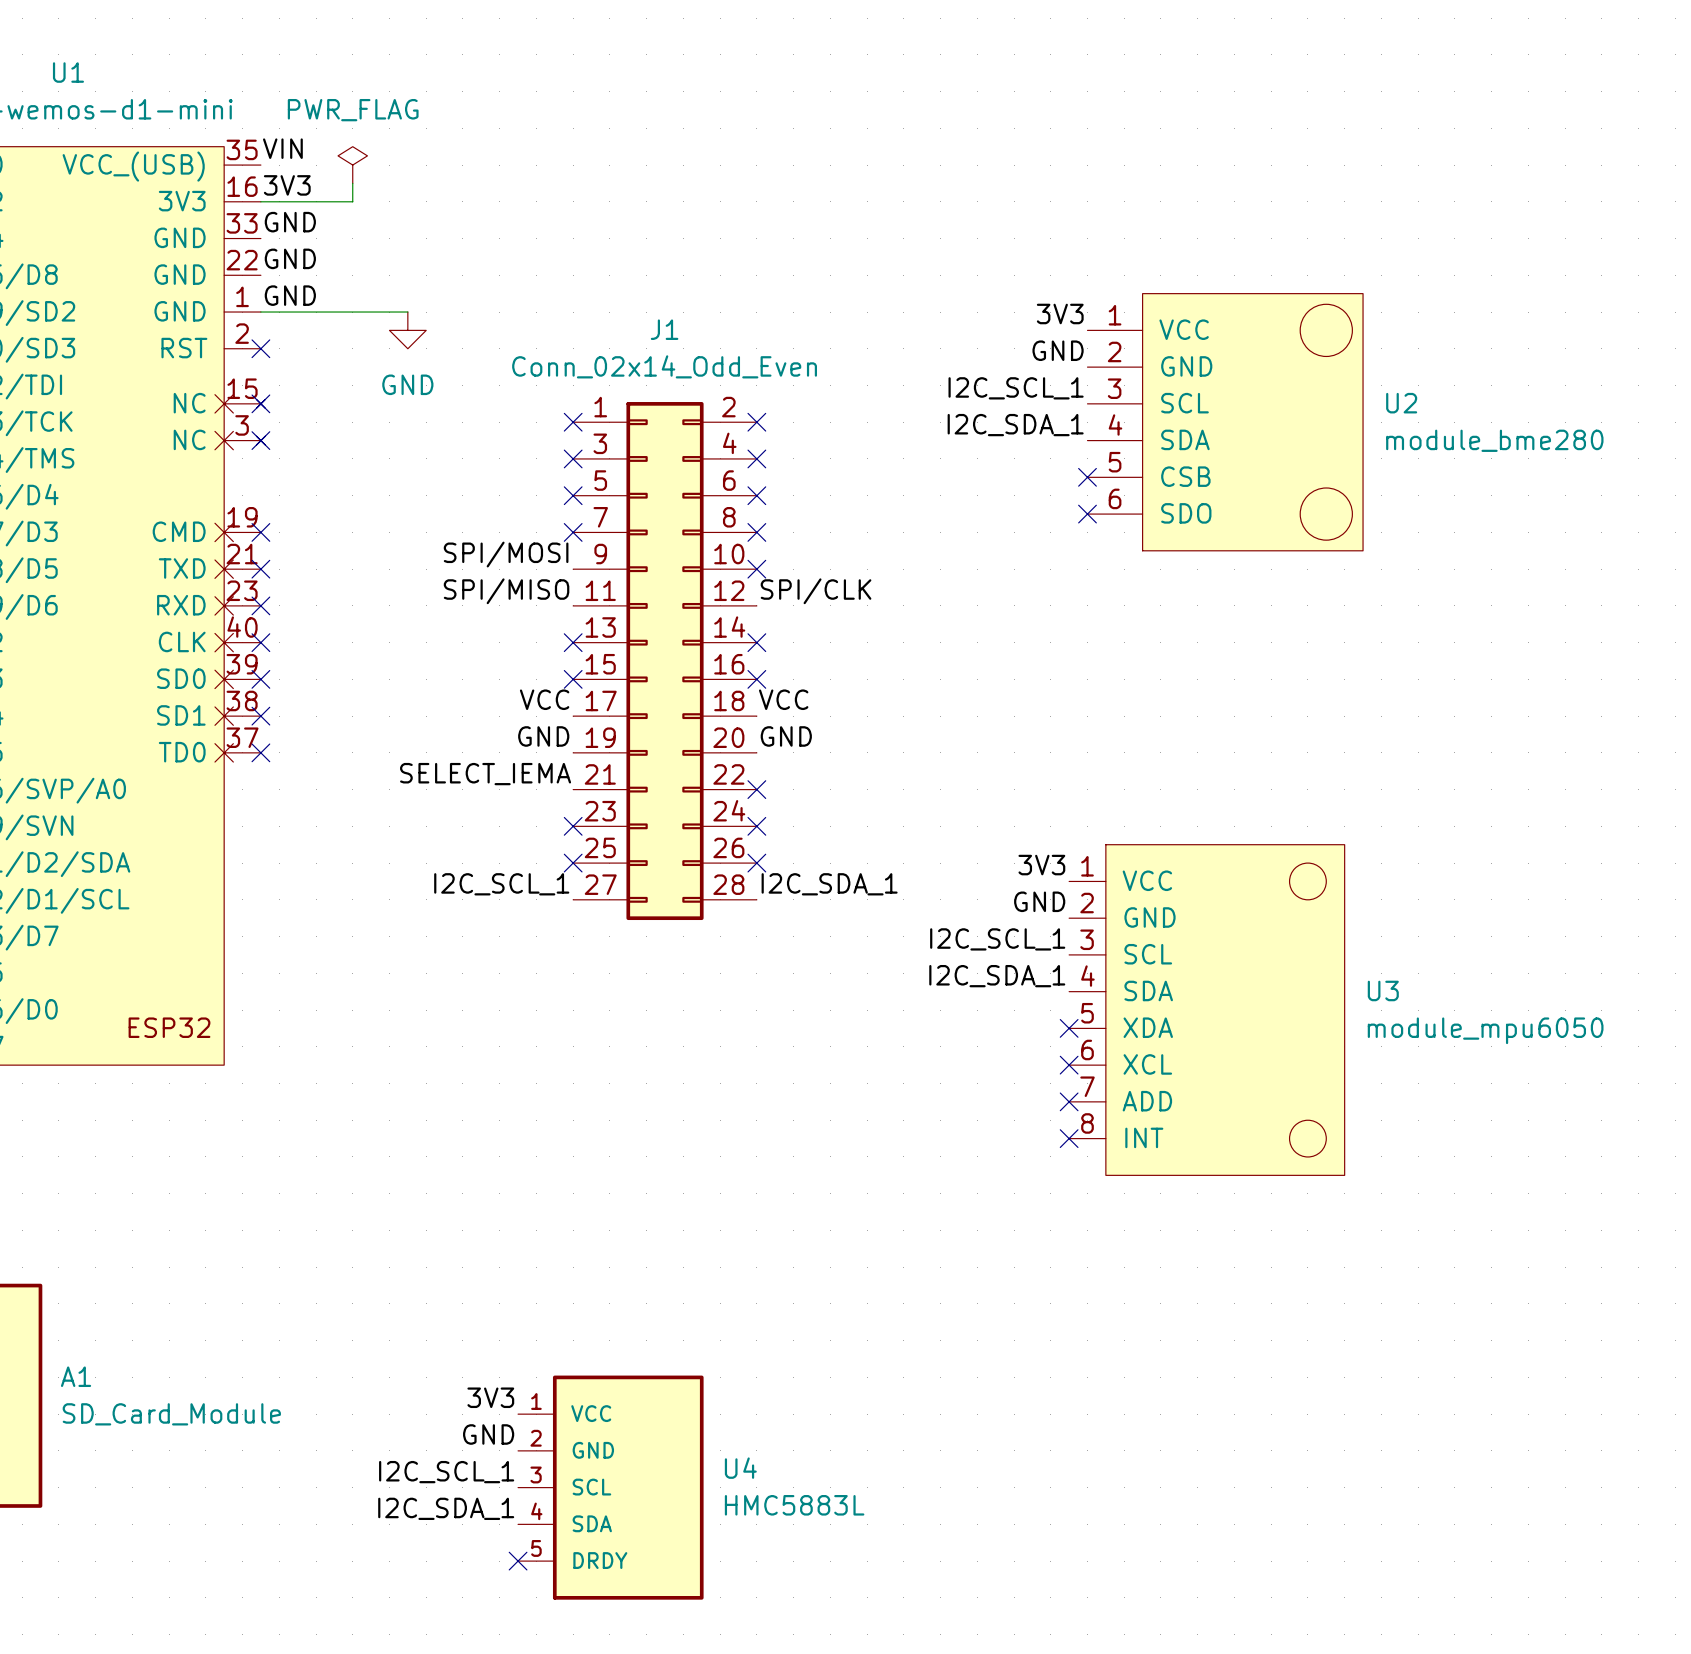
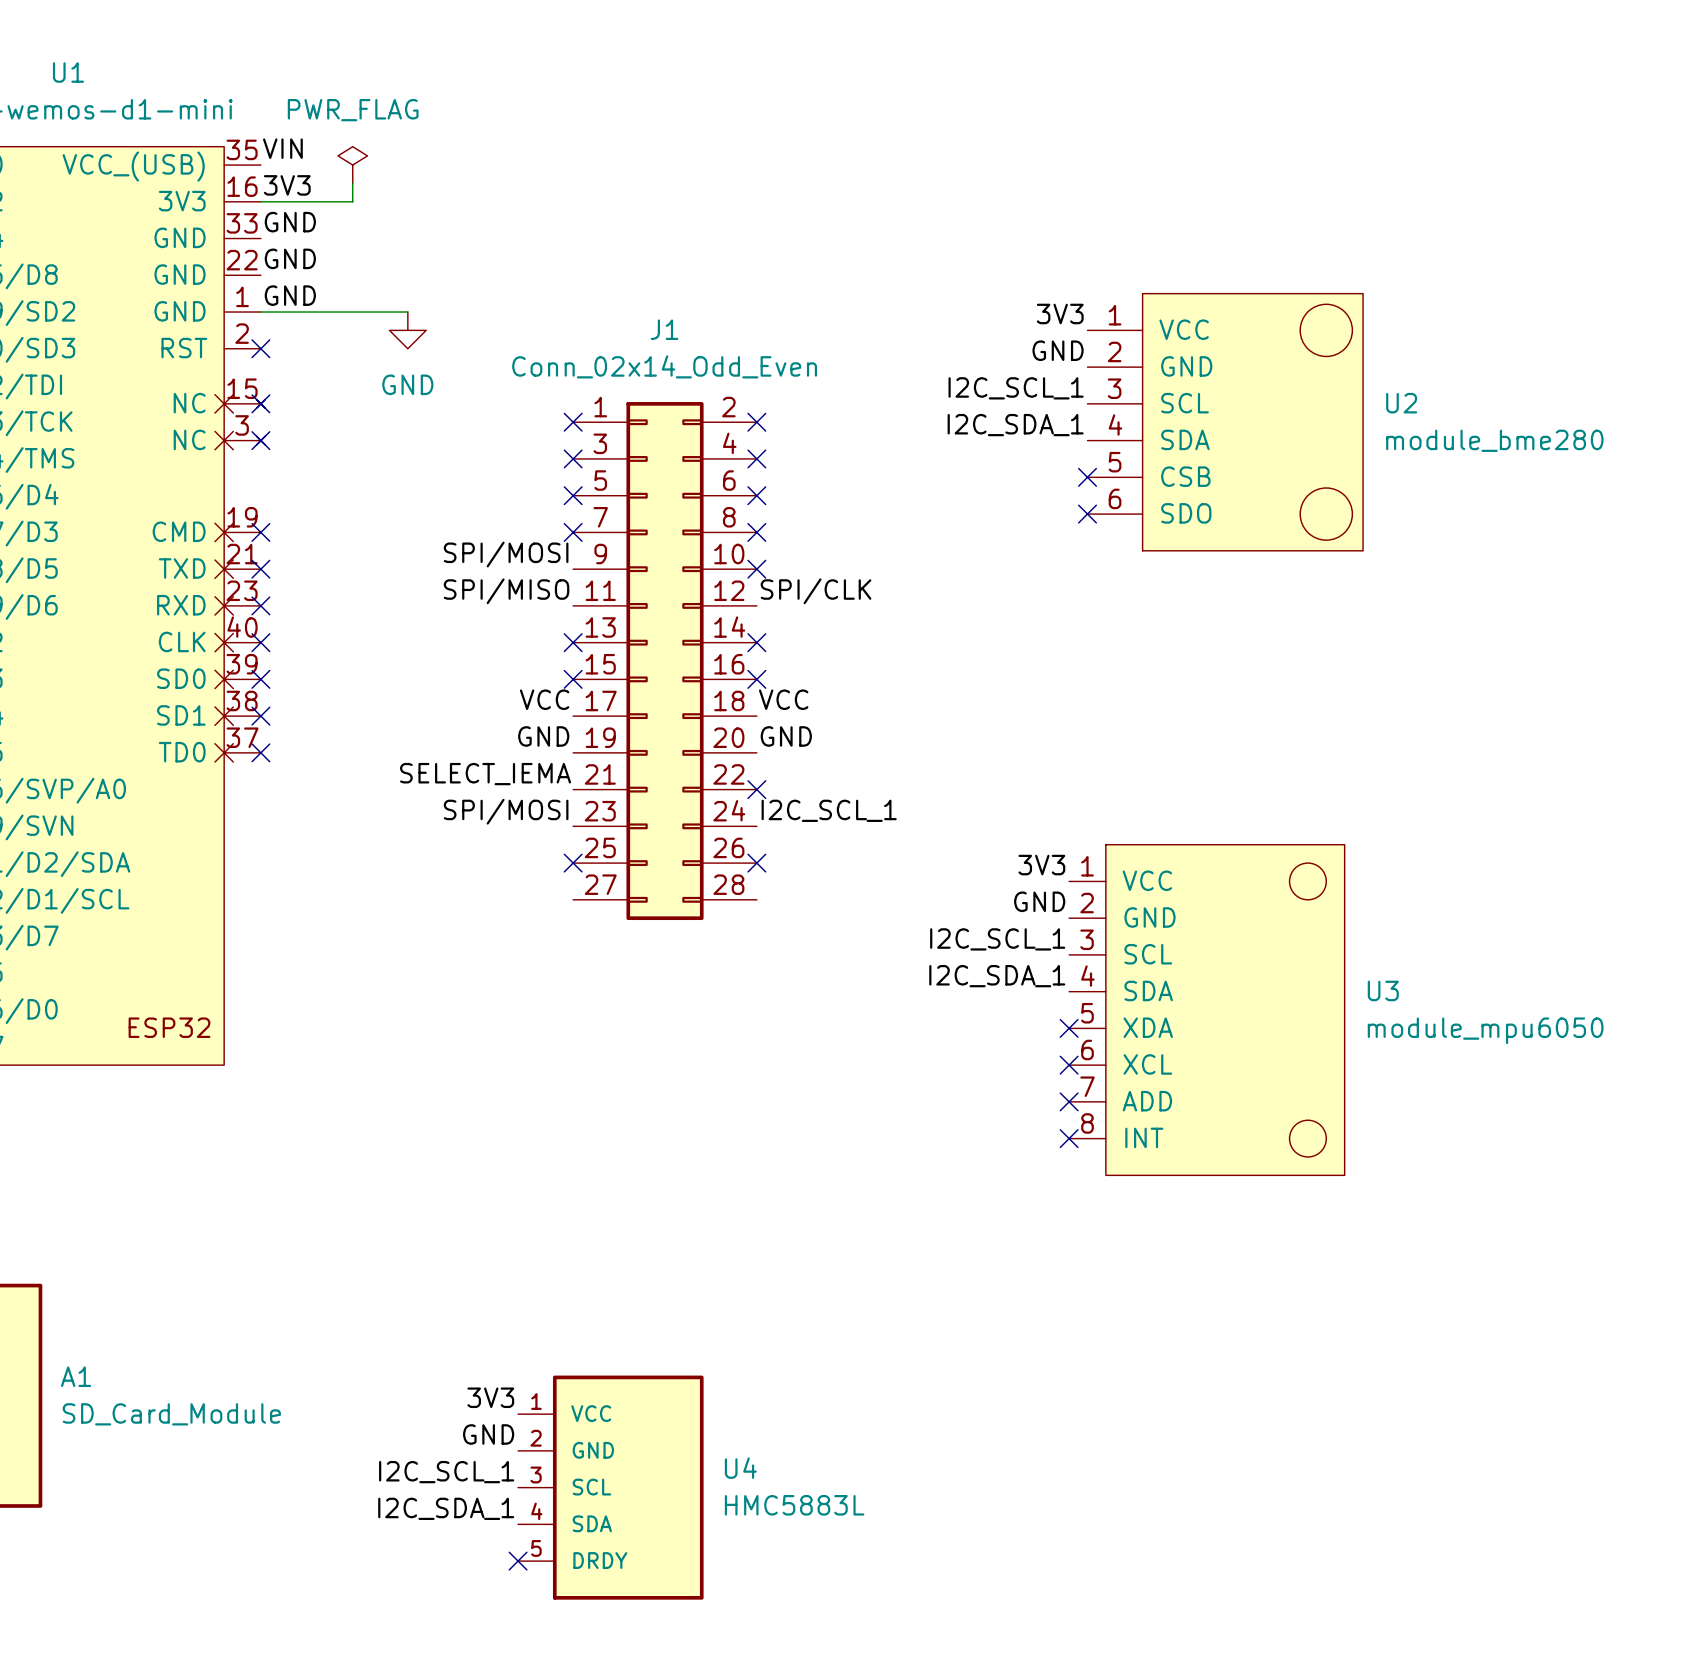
label: none -> SPI/MOSI (506, 811)
no-connect mark: (573, 826) -> none
no-connect mark: (756, 826) -> none
label position: I2C_SCL_1 (501, 884) -> I2C_SCL_1 (829, 810)
label: I2C_SDA_1 (829, 884) -> none

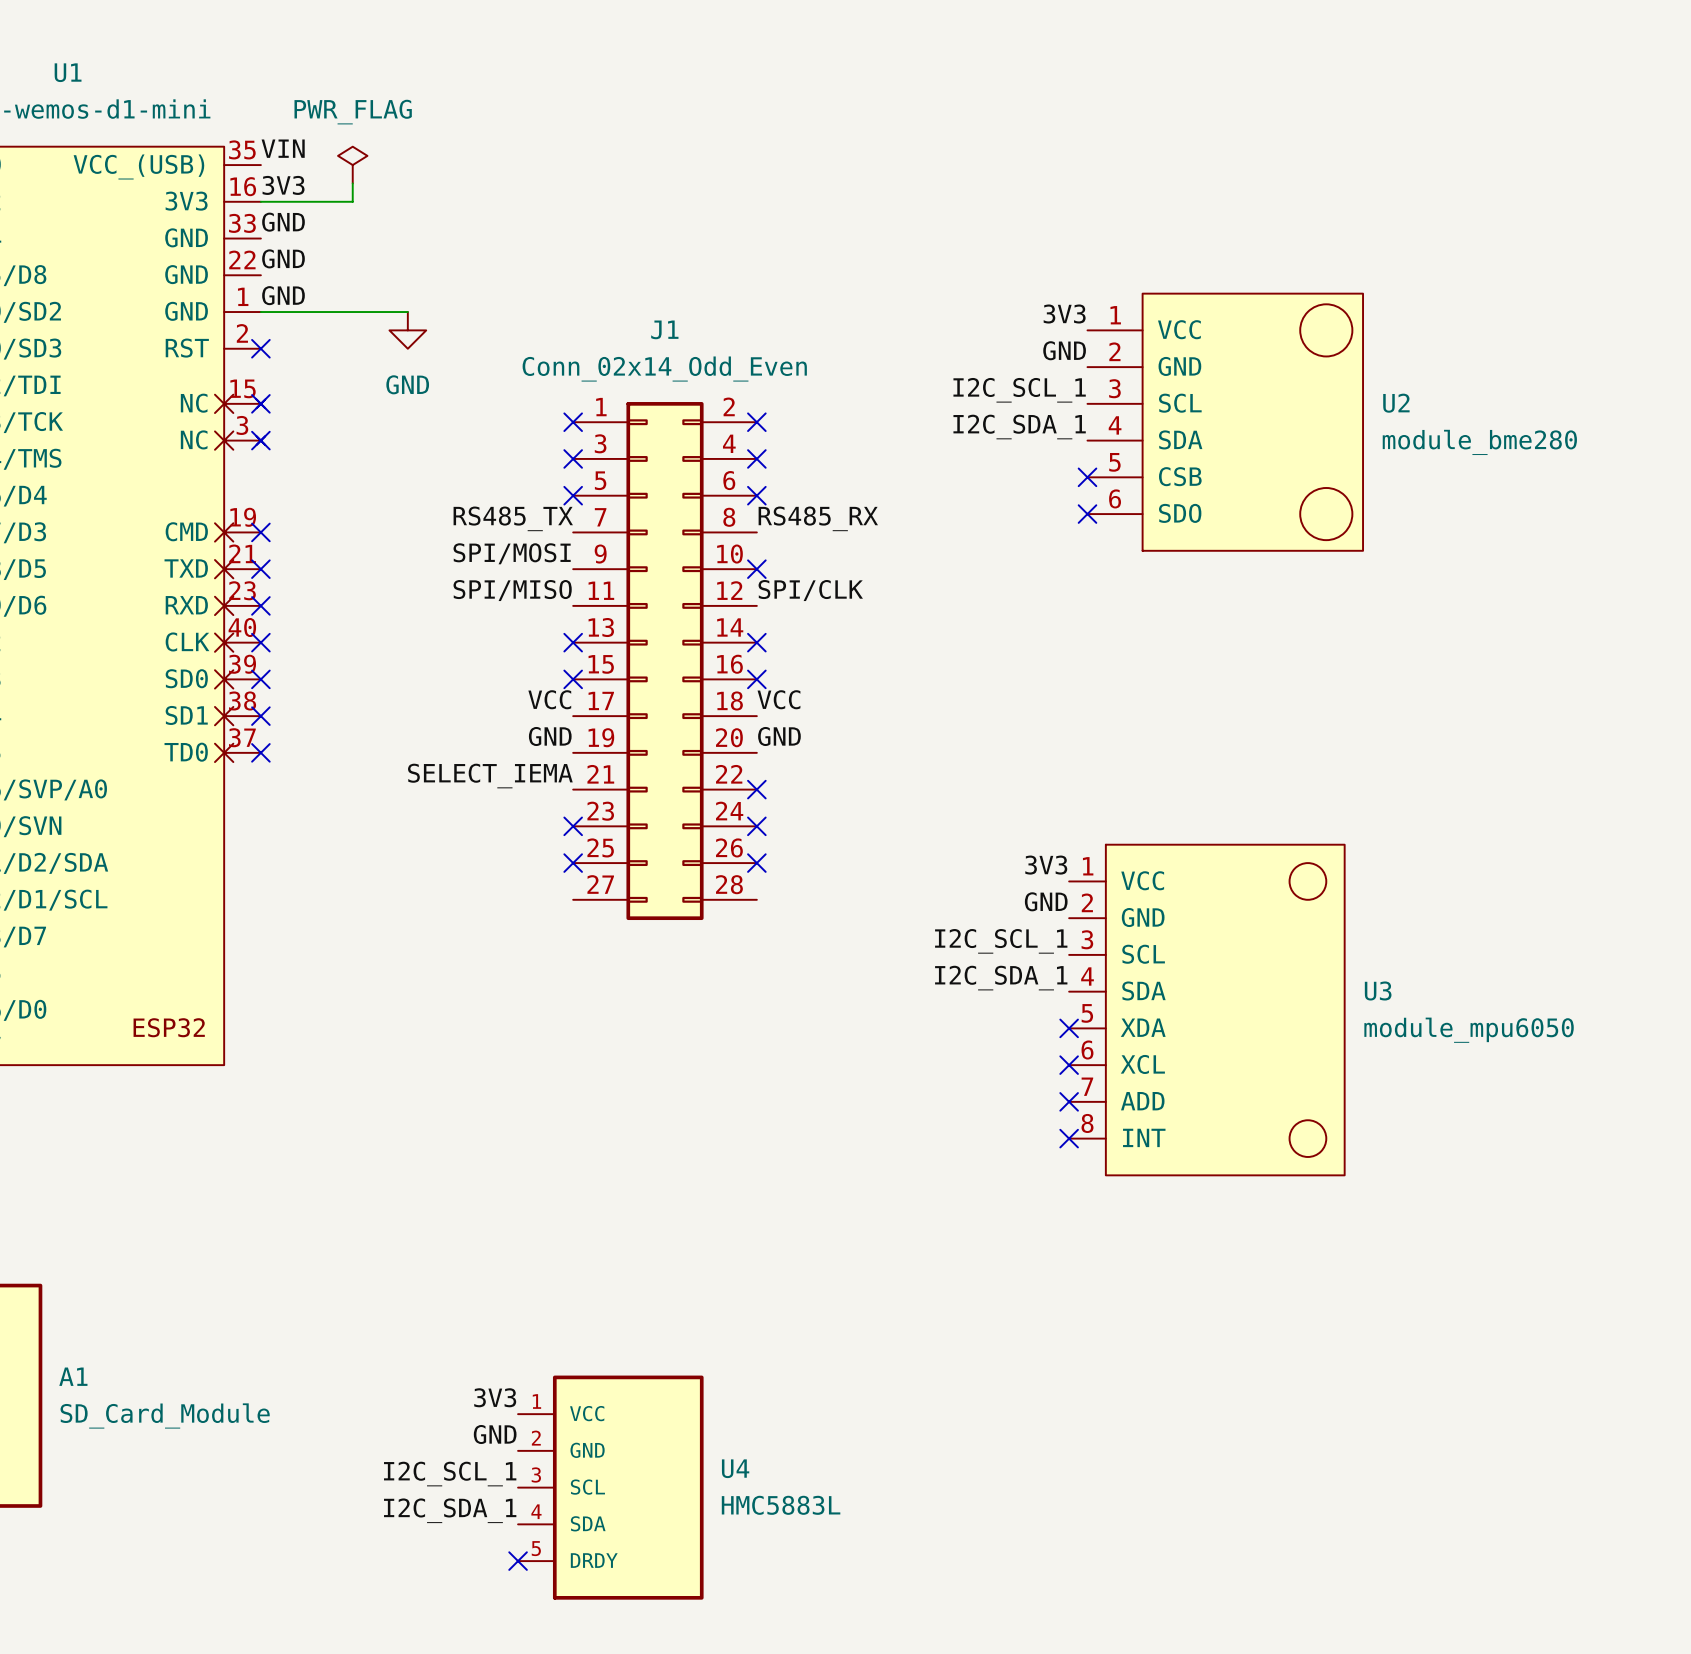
label: none -> RS485_TX (513, 518)
label: none -> RS485_RX (818, 518)
no-connect mark: (573, 532) -> none
no-connect mark: (756, 532) -> none
label: I2C_SCL_1 (829, 810) -> none
label: SPI/MOSI (506, 811) -> none
no-connect mark: none -> (573, 826)
no-connect mark: none -> (756, 826)

